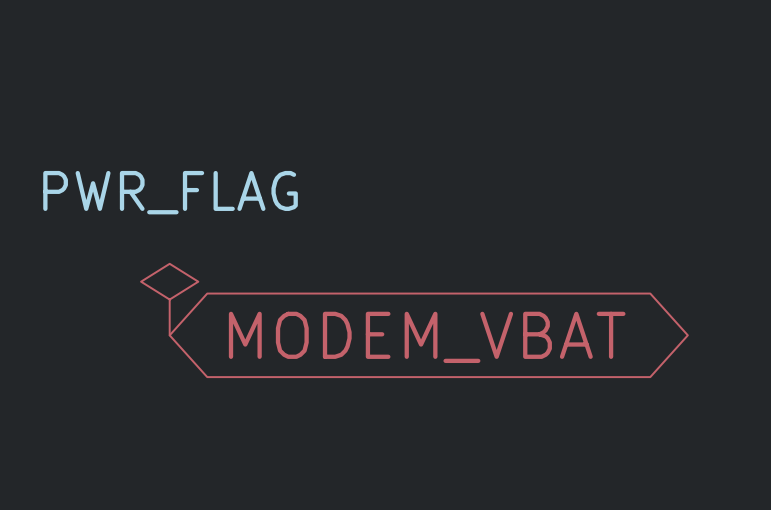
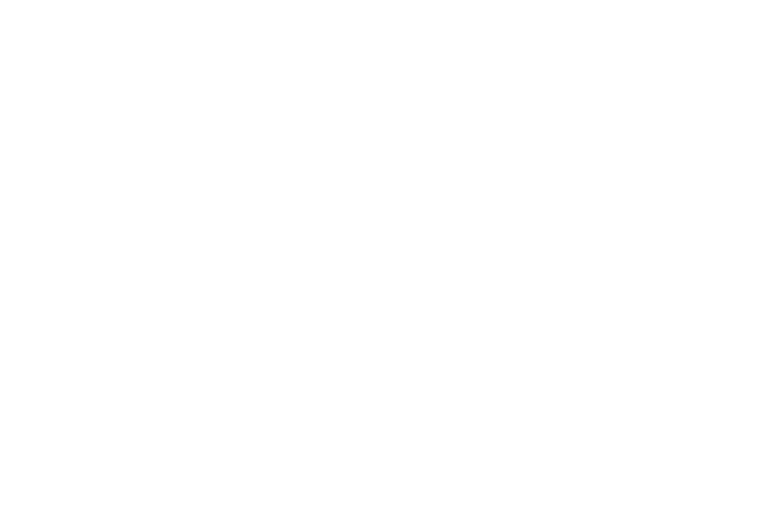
power symbol: PWR_FLAG (169, 299) -> none
global label: MODEM_VBAT (427, 337) -> none

